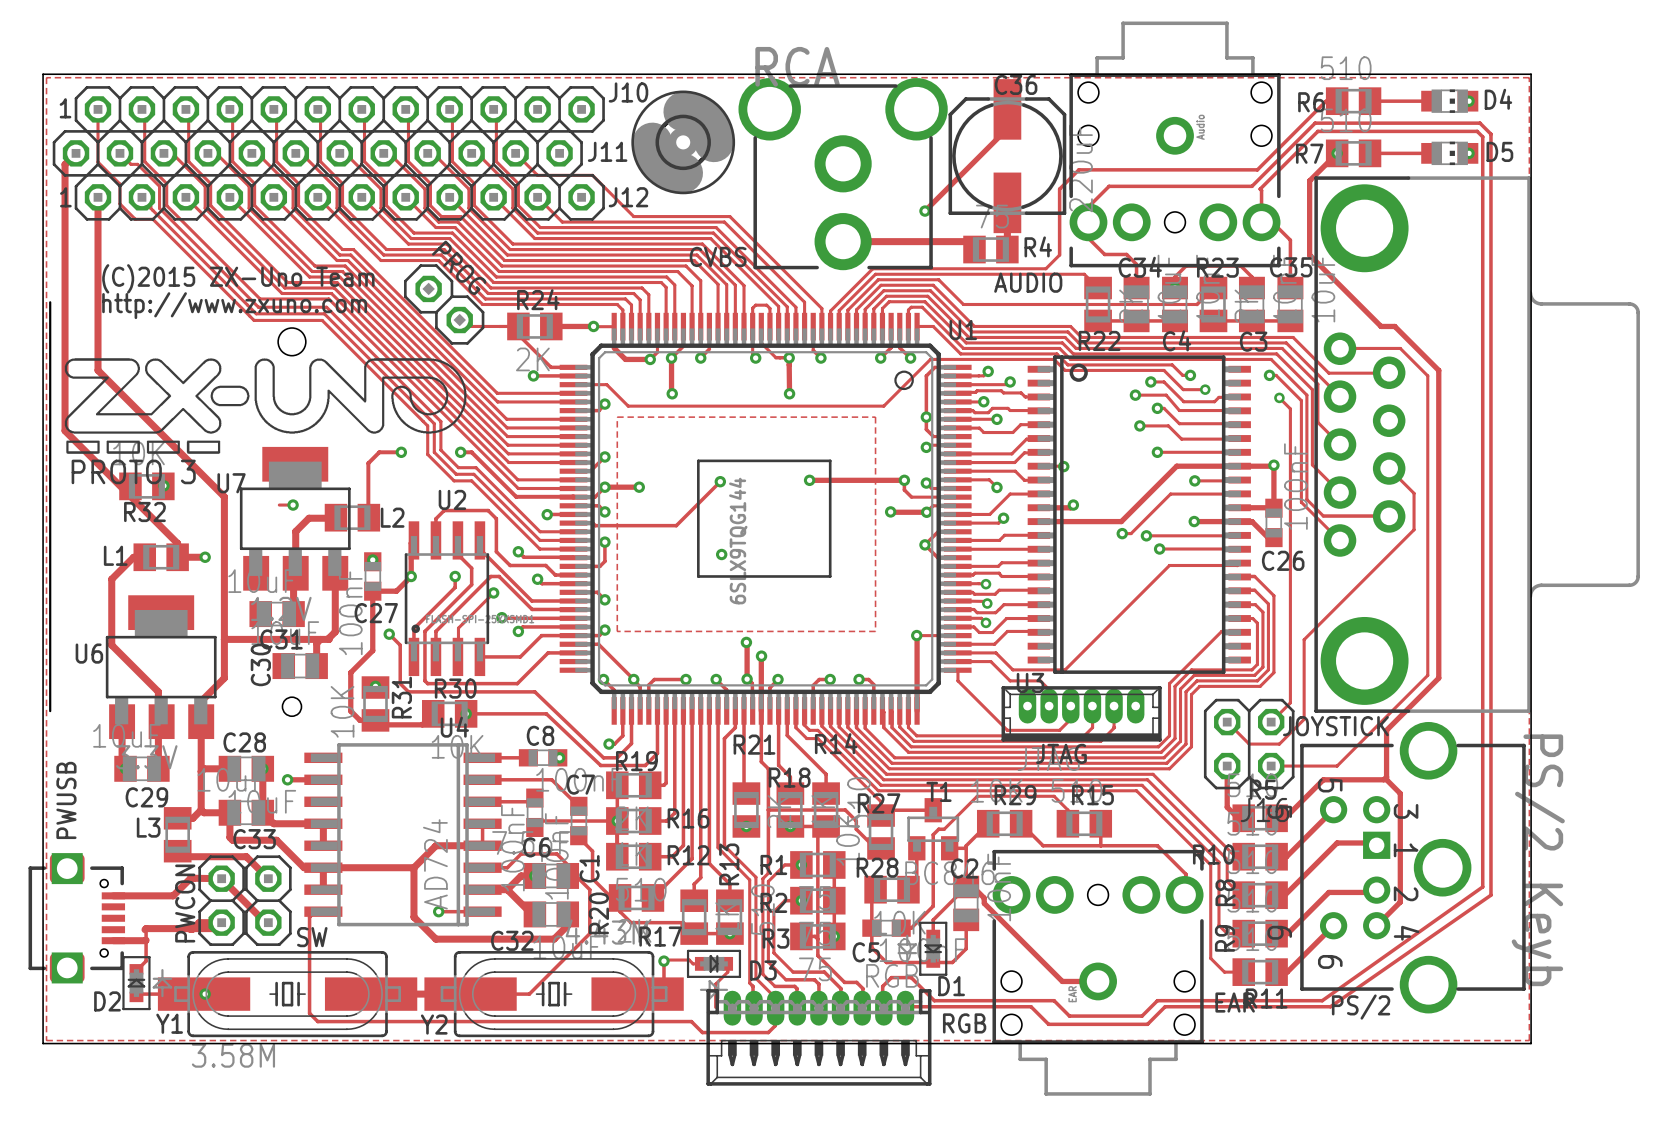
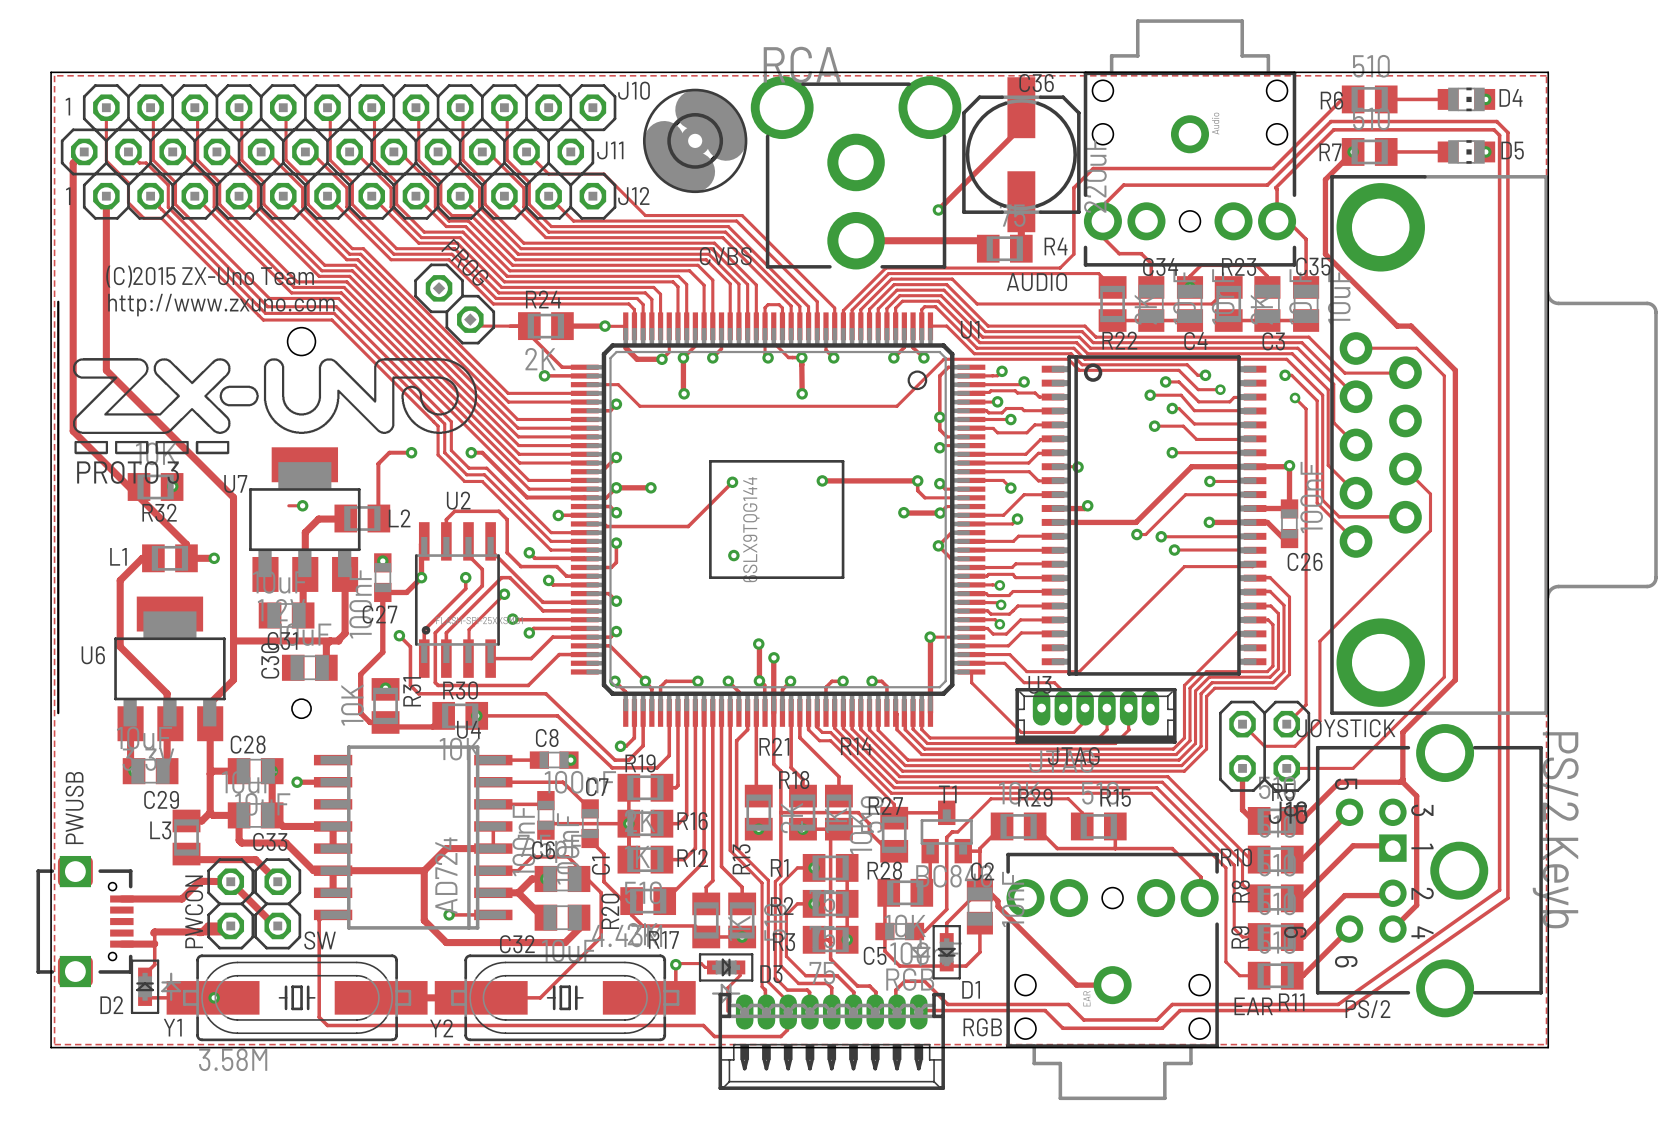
zone outline: (617, 417) (875, 417) (875, 631) (617, 631) (617, 417) -> none

